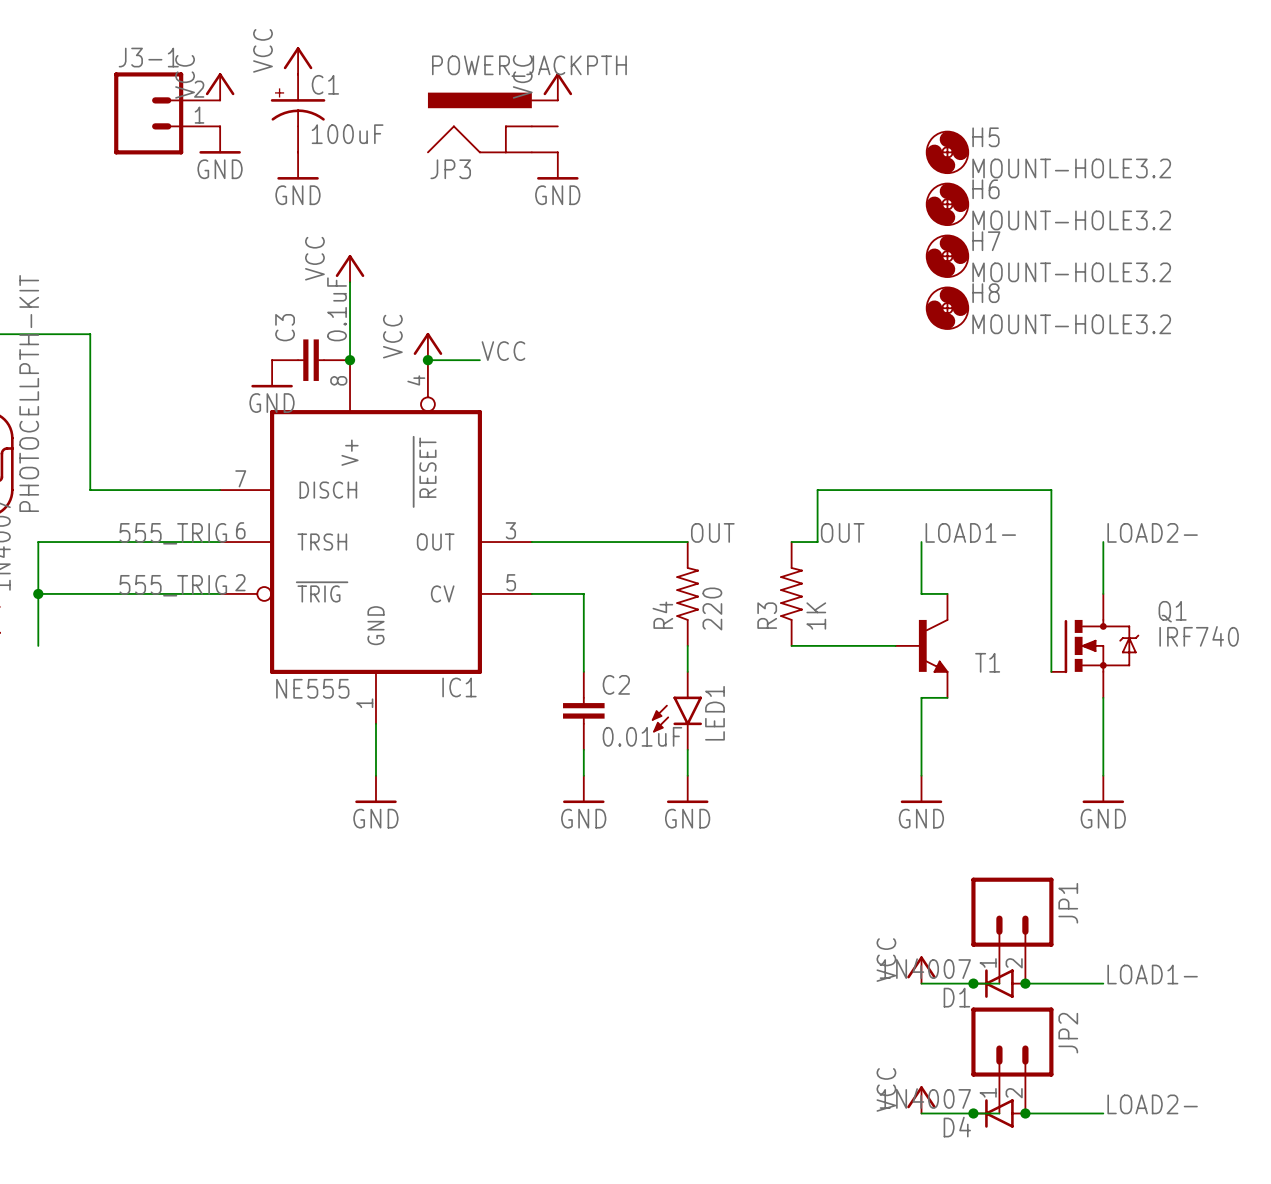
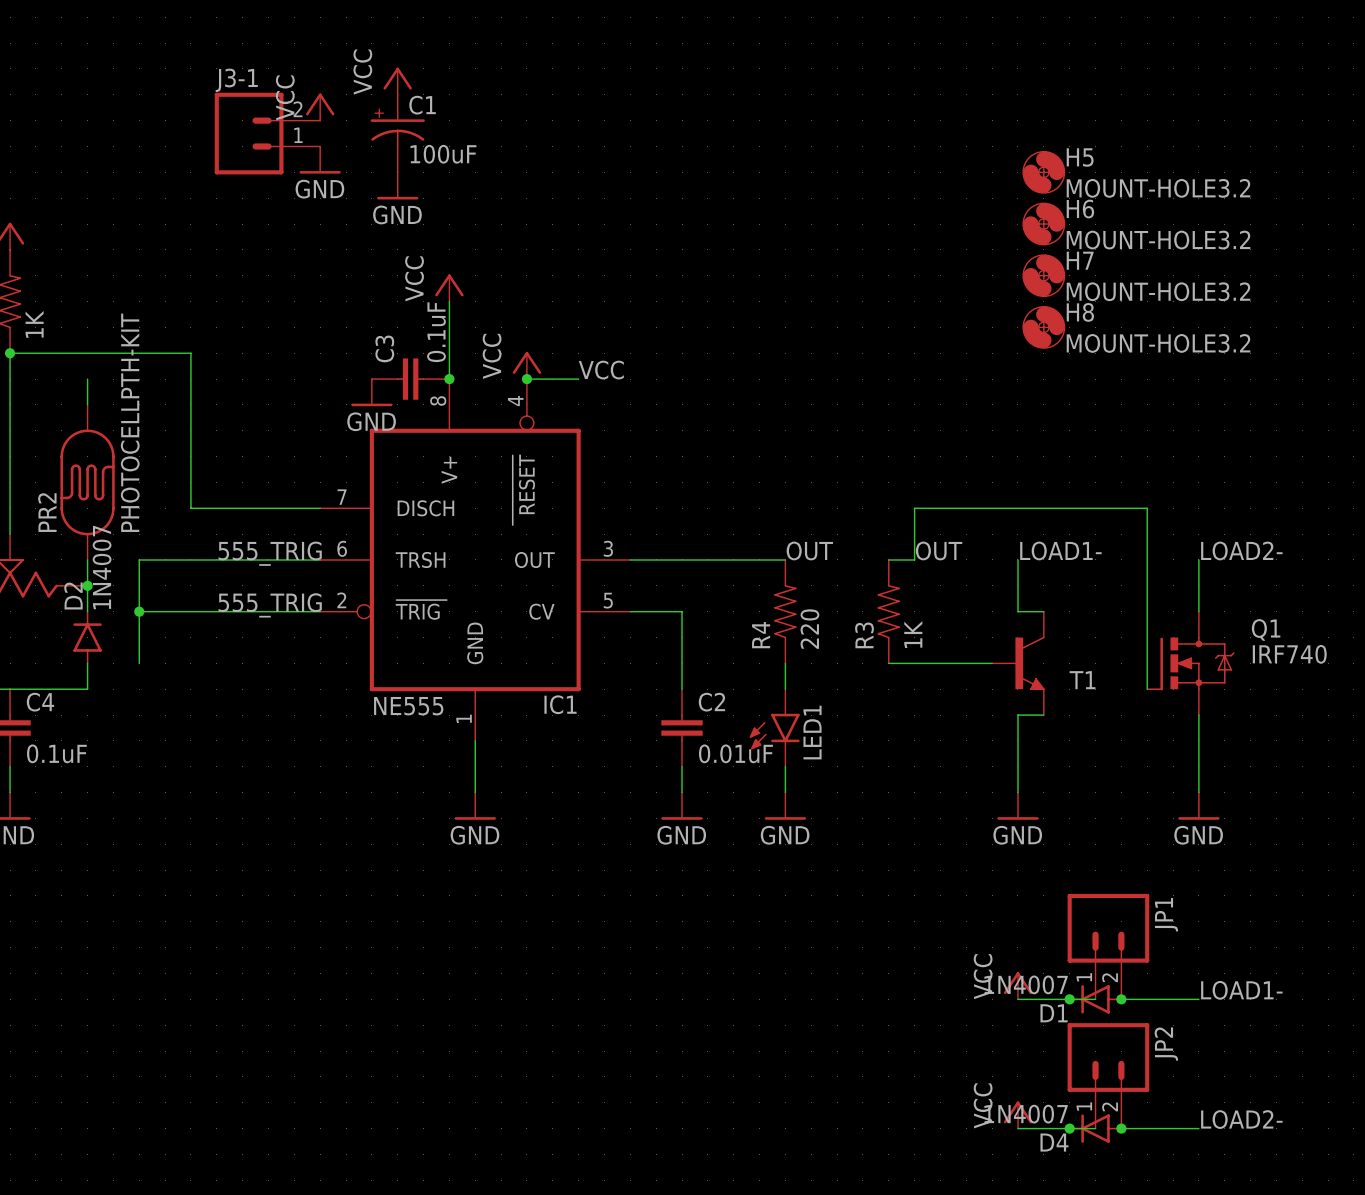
power symbol: VCC (557, 86) -> none
JP3: POWER_JACKPTH (492, 122) -> none
power symbol: GND (557, 166) -> none

